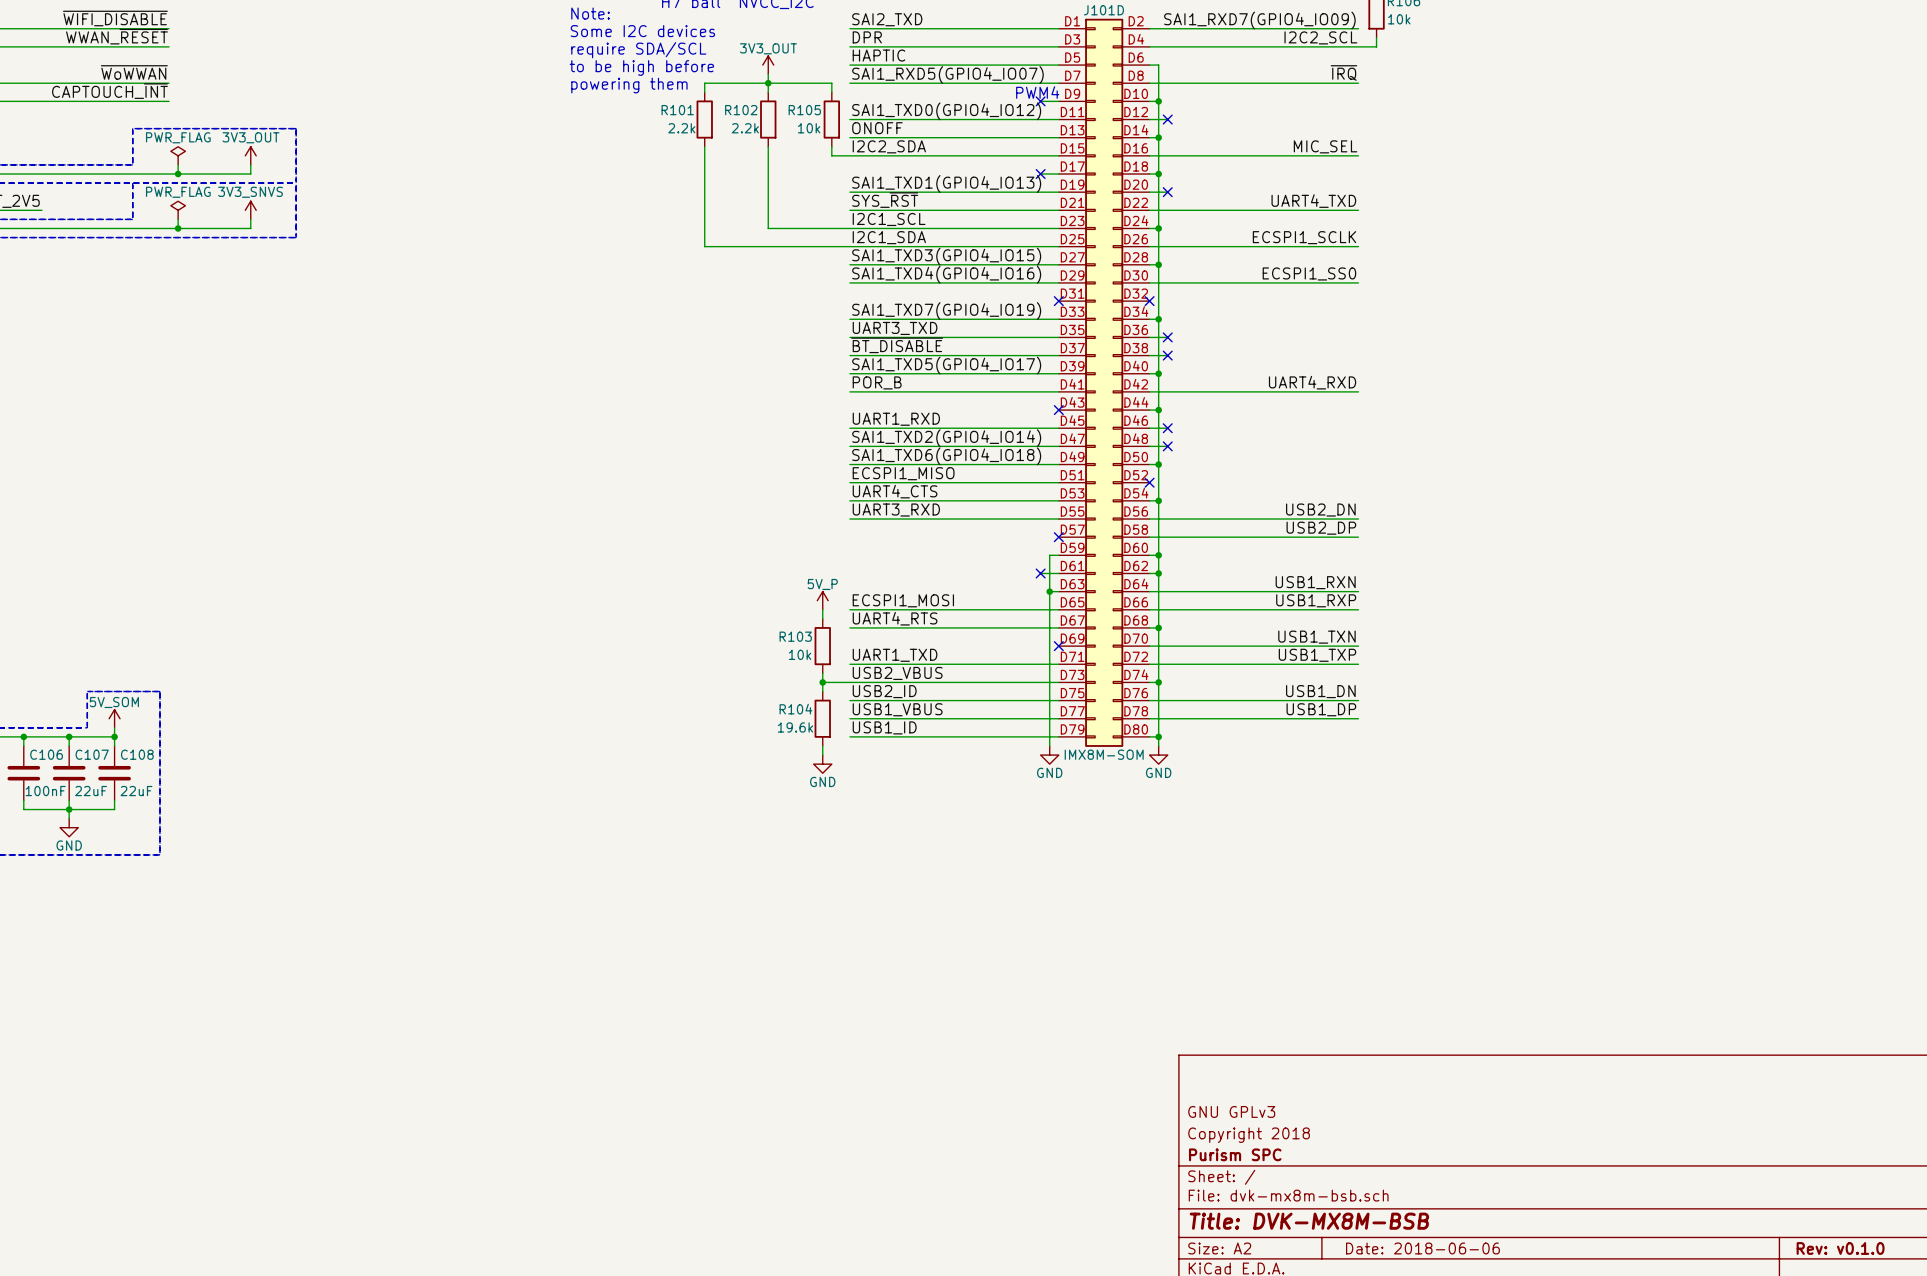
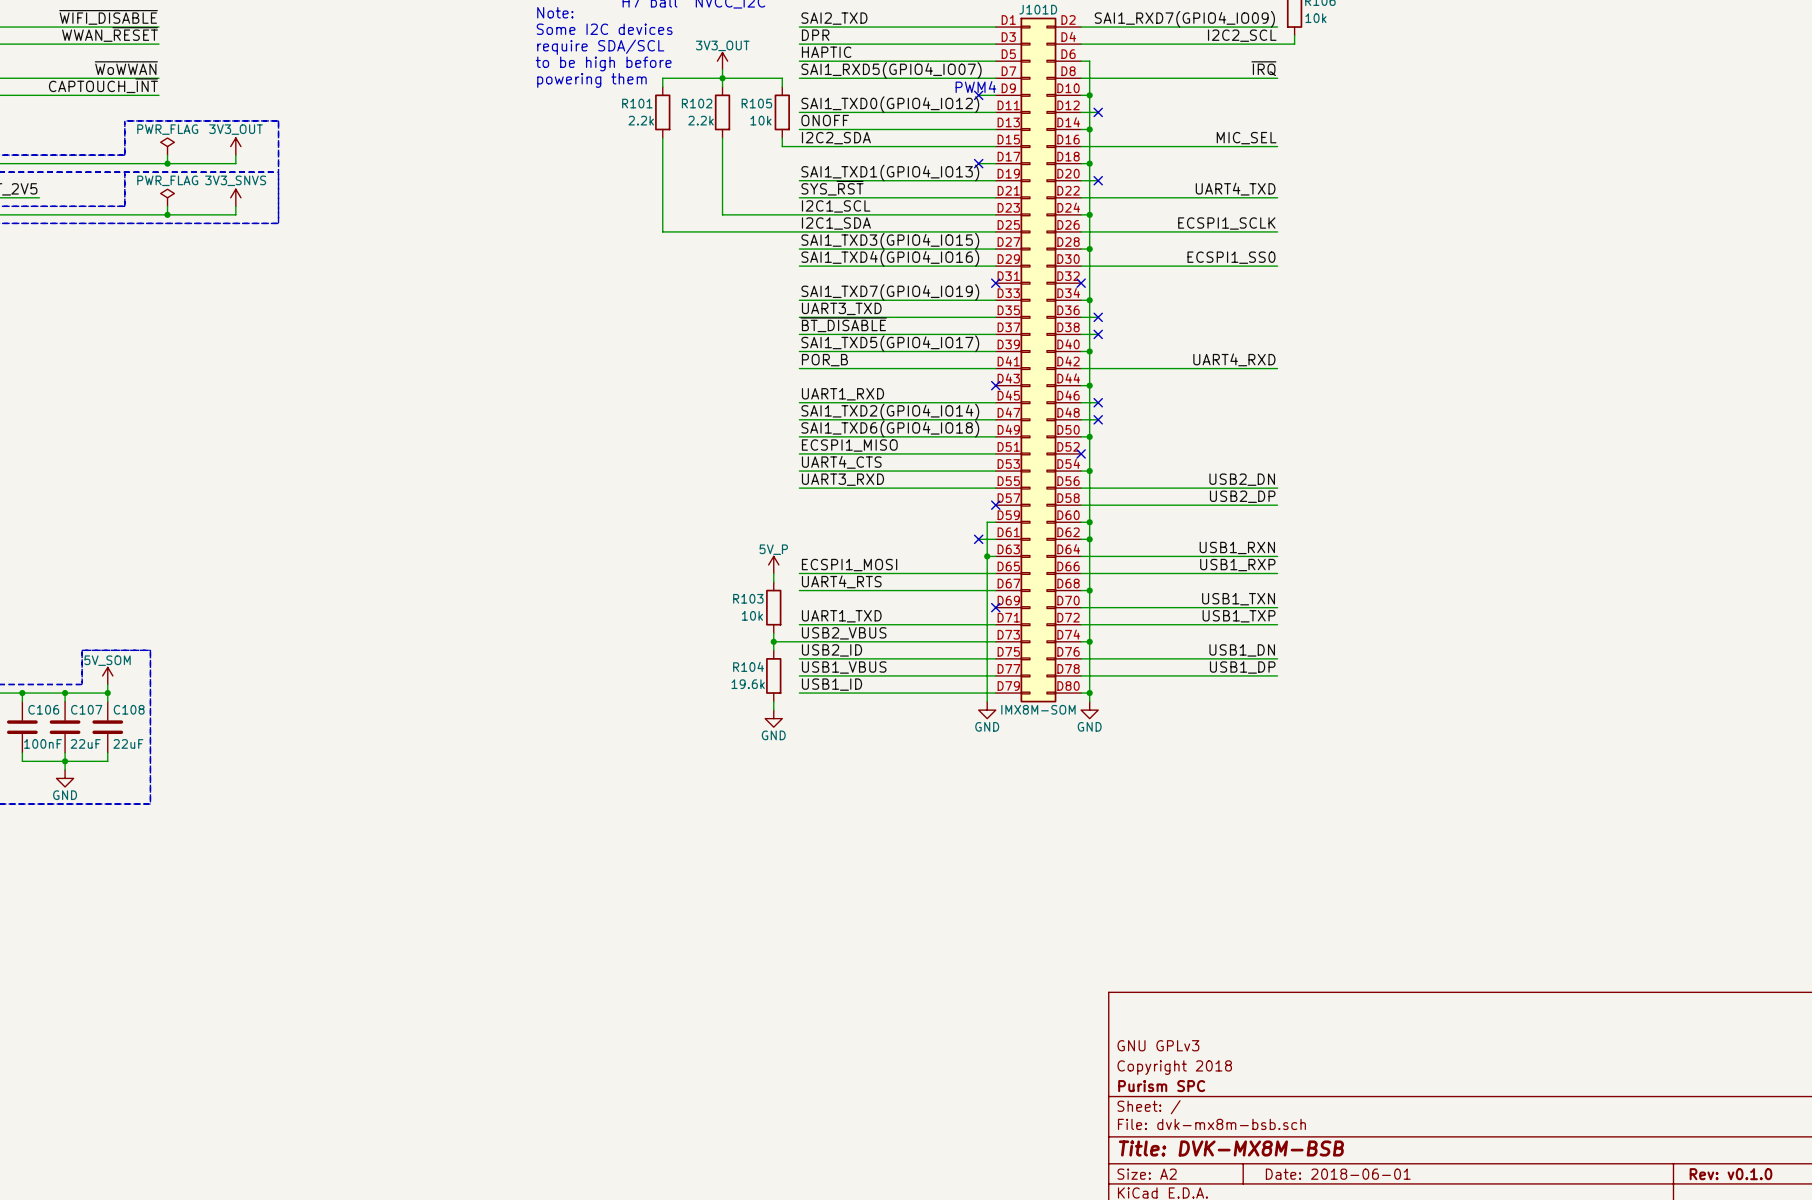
title block: Date: 2018-06-06 (1422, 1248) -> Date: 2018-06-01 (1338, 1174)

